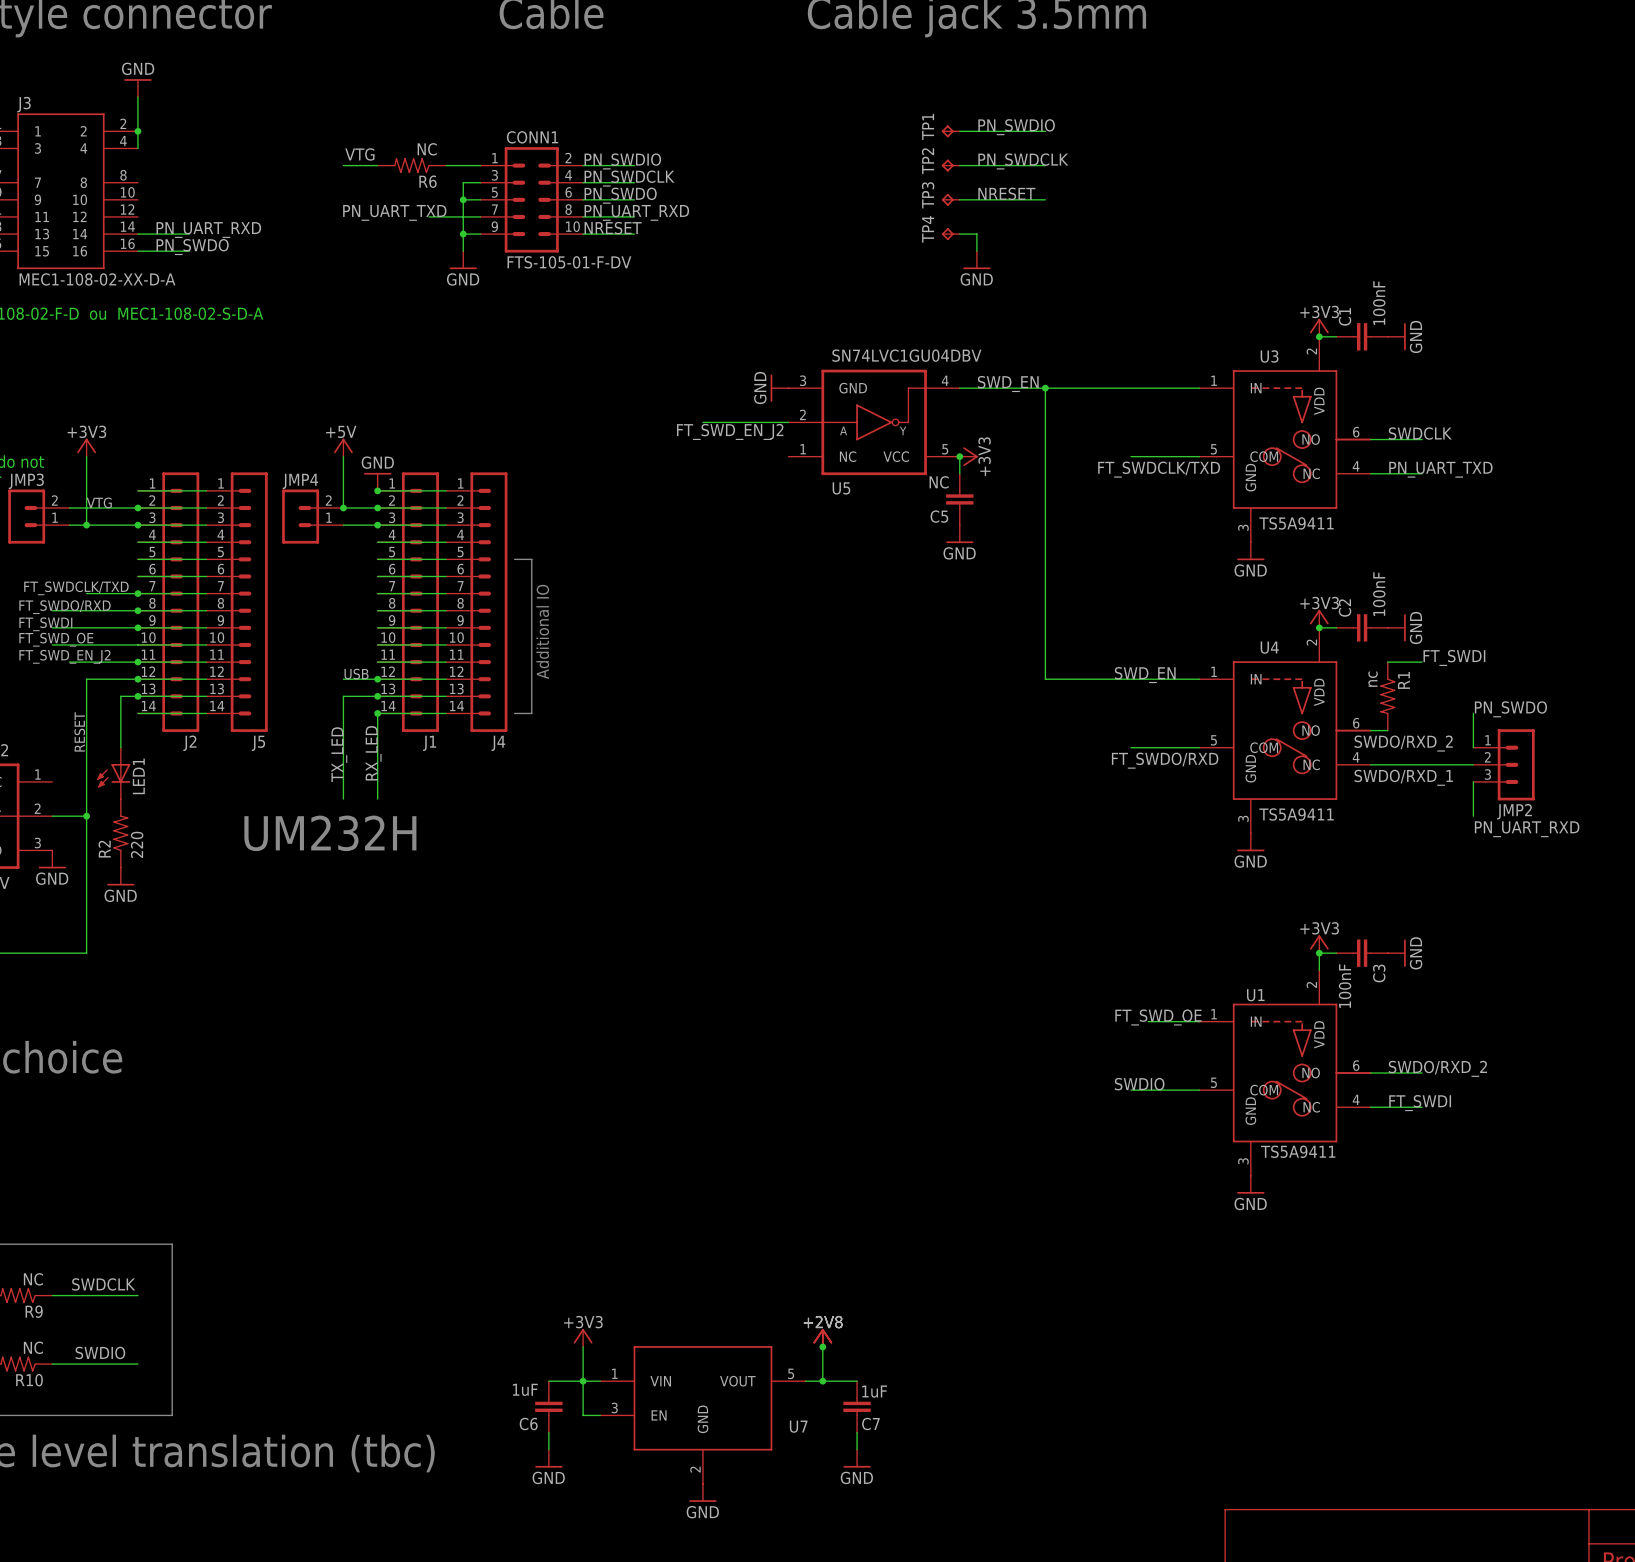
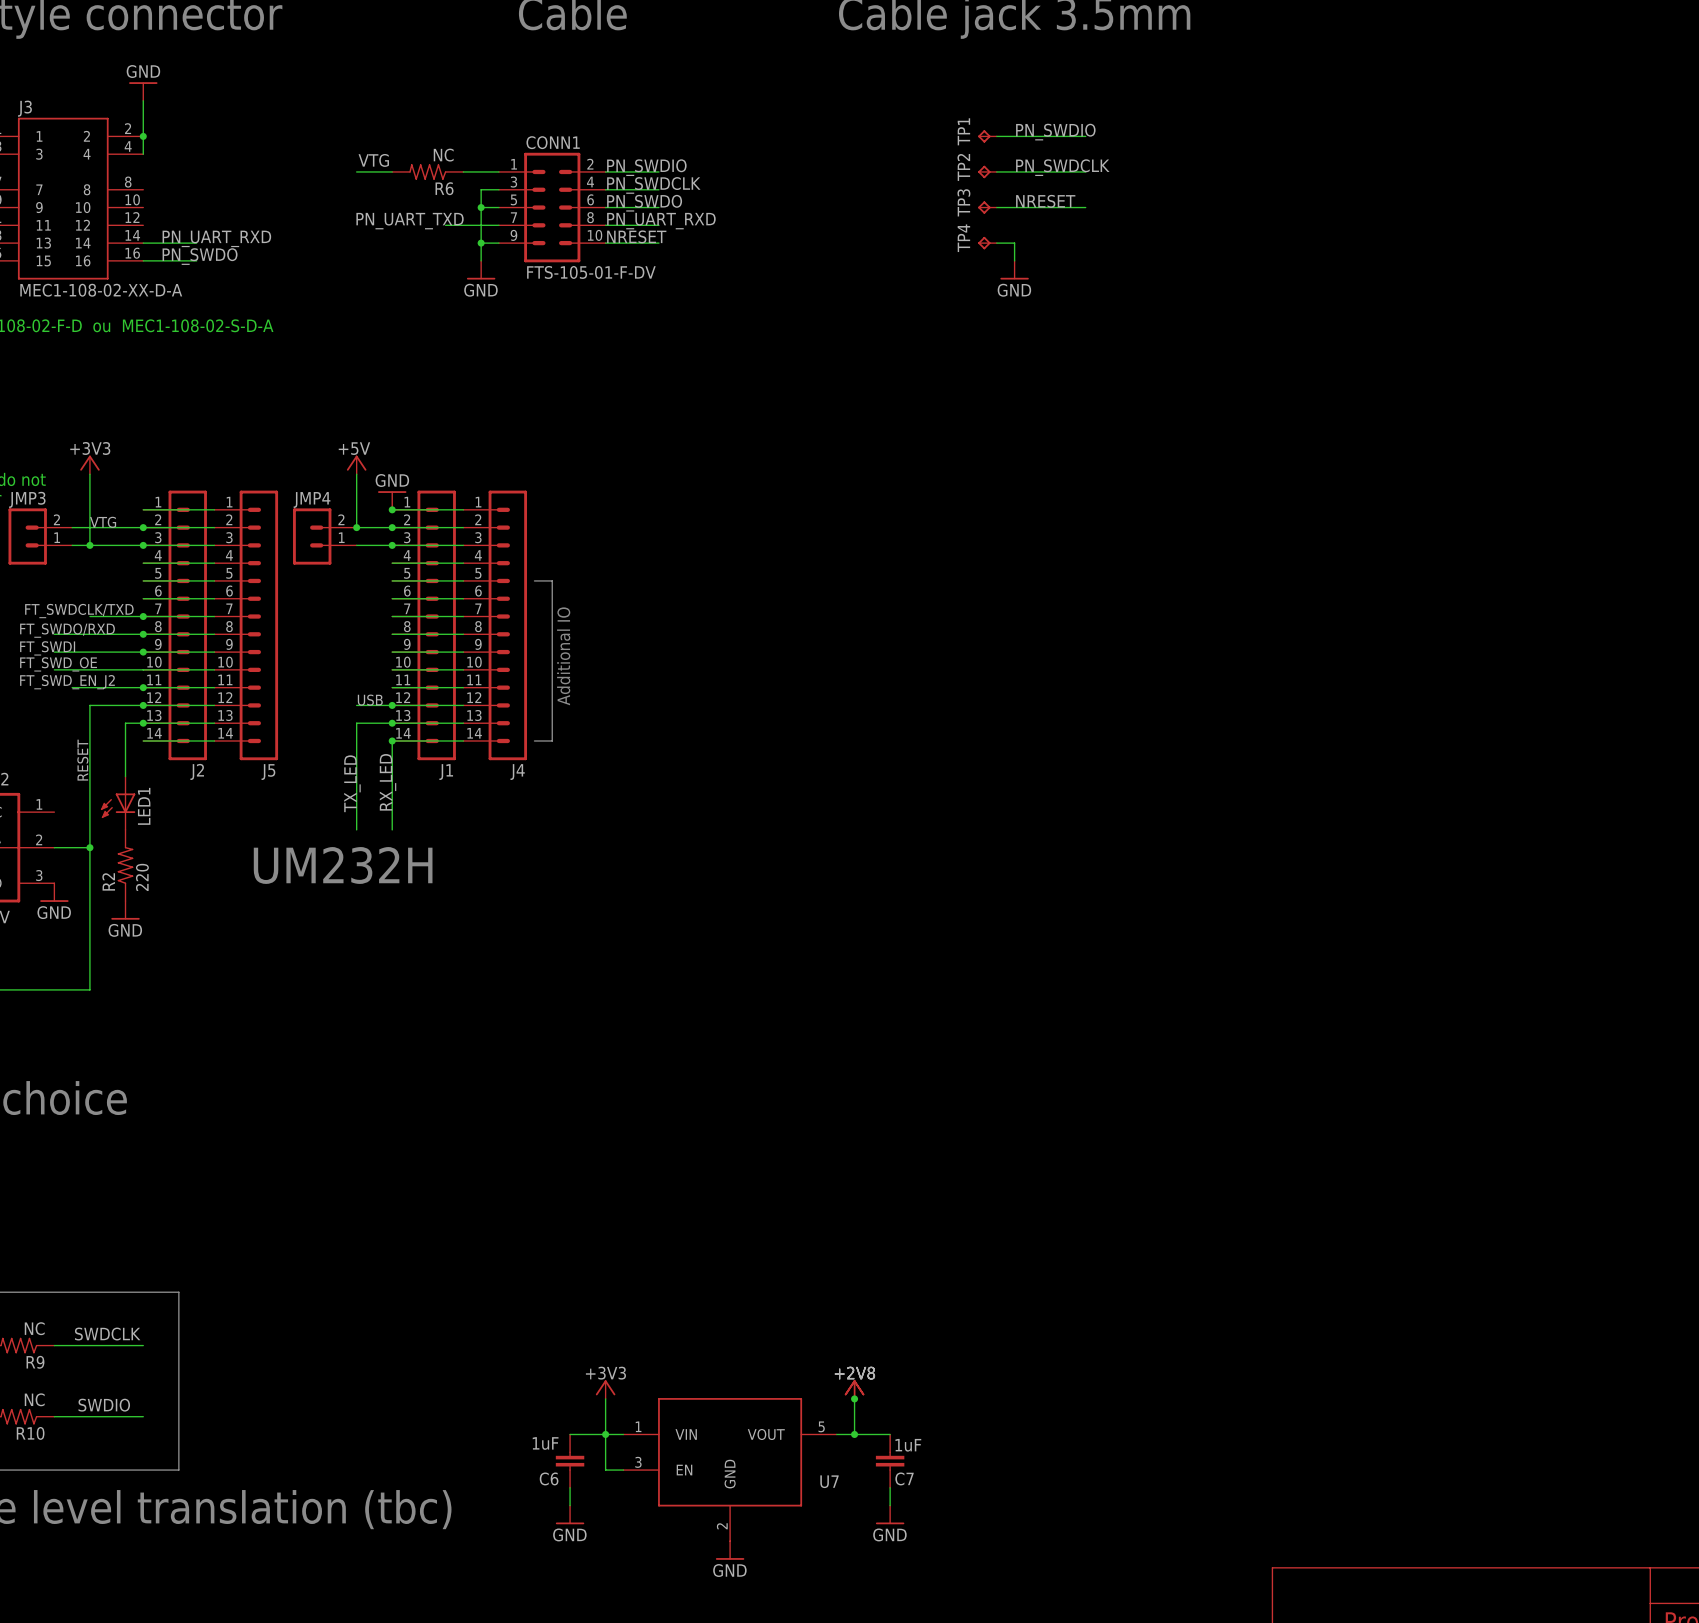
power symbol: +3V3 (1319, 327) -> none
wire: (1319, 336) (1336, 336) -> none
junction: (1319, 336) -> none
C1: 100nF (1362, 336) -> none
power symbol: GND (1396, 336) -> none
label: SWD_EN (1008, 384) -> none
power symbol: GND (779, 388) -> none
wire: (959, 388) (1199, 388) -> none
wire: (1045, 388) (1045, 679) (1199, 679) -> none
junction: (1045, 388) -> none
wire: (702, 422) (788, 422) -> none
U5: SN74LVC1GU04DBV (874, 422) -> none
label: FT_SWD_EN_J2 (730, 431) -> none
label: SWDCLK (1420, 433) -> none
U3: TS5A9411 (1285, 439) -> none
wire: (1370, 439) (1422, 439) -> none
wire: (959, 456) (959, 473) -> none
junction: (959, 456) -> none
power symbol: +3V3 (968, 456) -> none
wire: (1130, 456) (1199, 456) -> none
label: FT_SWDCLK/TXD (1159, 469) -> none
label: PN_UART_TXD (1440, 469) -> none
wire: (1370, 473) (1422, 473) -> none
C5: NC (959, 499) -> none
power symbol: GND (959, 534) -> none
power symbol: GND (1250, 551) -> none
power symbol: +3V3 (1319, 618) -> none
wire: (1319, 627) (1336, 627) -> none
junction: (1319, 627) -> none
C2: 100nF (1362, 627) -> none
power symbol: GND (1396, 627) -> none
label: FT_SWDI (1454, 657) -> none
wire: (1387, 662) (1422, 662) -> none
label: SWD_EN (1145, 675) -> none
R1: nc (1387, 696) -> none
label: PN_SWDO (1510, 709) -> none
wire: (1473, 713) (1473, 747) -> none
U4: TS5A9411 (1285, 730) -> none
wire: (1370, 730) (1387, 730) -> none
label: SWDO/RXD_2 (1403, 743) -> none
wire: (1130, 747) (1199, 747) -> none
label: FT_SWDO/RXD (1165, 760) -> none
wire: (1370, 764) (1473, 764) -> none
JMP2: (1504, 764) -> none
label: SWDO/RXD_1 (1403, 777) -> none
wire: (1473, 781) (1473, 816) -> none
label: PN_UART_RXD (1527, 829) -> none
power symbol: GND (1250, 842) -> none
power symbol: +3V3 (1319, 944) -> none
junction: (1319, 953) -> none
wire: (1336, 953) (1319, 953) (1319, 970) -> none
C3: 100nF (1362, 953) -> none
power symbol: GND (1396, 953) -> none
label: FT_SWD_OE (1158, 1017) -> none
wire: (1148, 1021) (1199, 1021) -> none
label: SWDO/RXD_2 (1437, 1068) -> none
U1: TS5A9411 (1285, 1073) -> none
wire: (1370, 1073) (1422, 1073) -> none
label: SWDIO (1139, 1084) -> none
wire: (1130, 1090) (1199, 1090) -> none
label: FT_SWDI (1420, 1103) -> none
wire: (1370, 1107) (1422, 1107) -> none
power symbol: GND (1250, 1184) -> none

